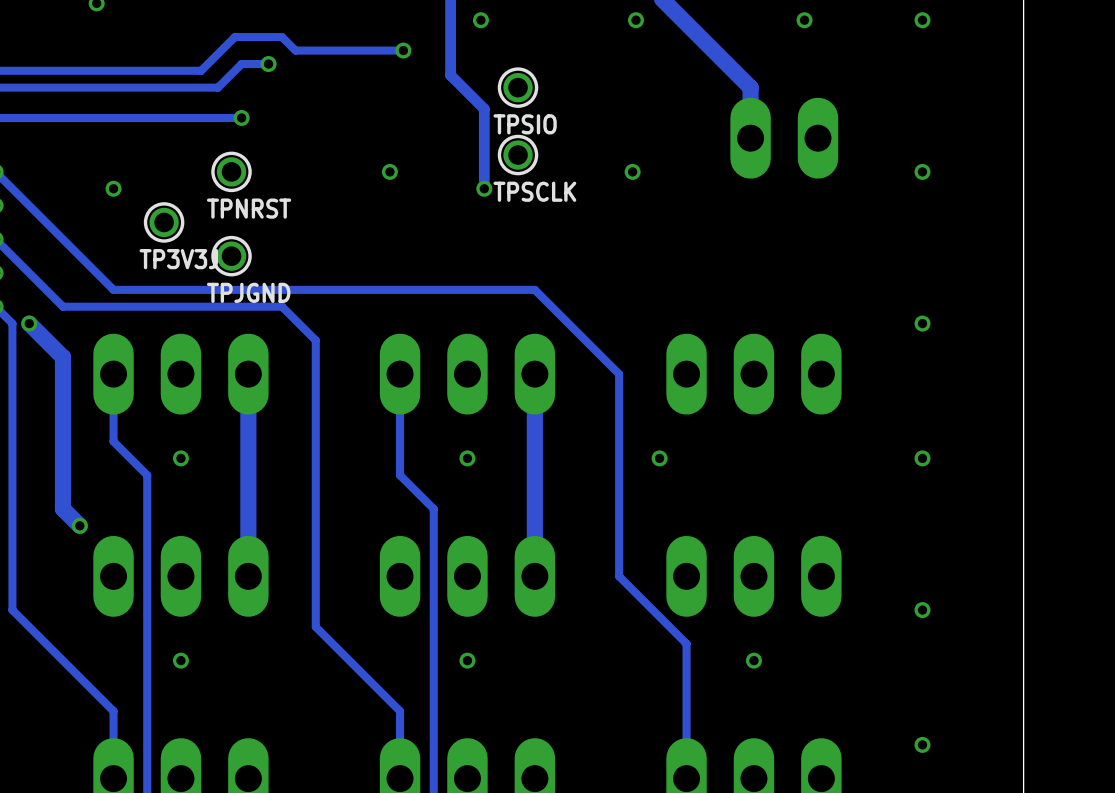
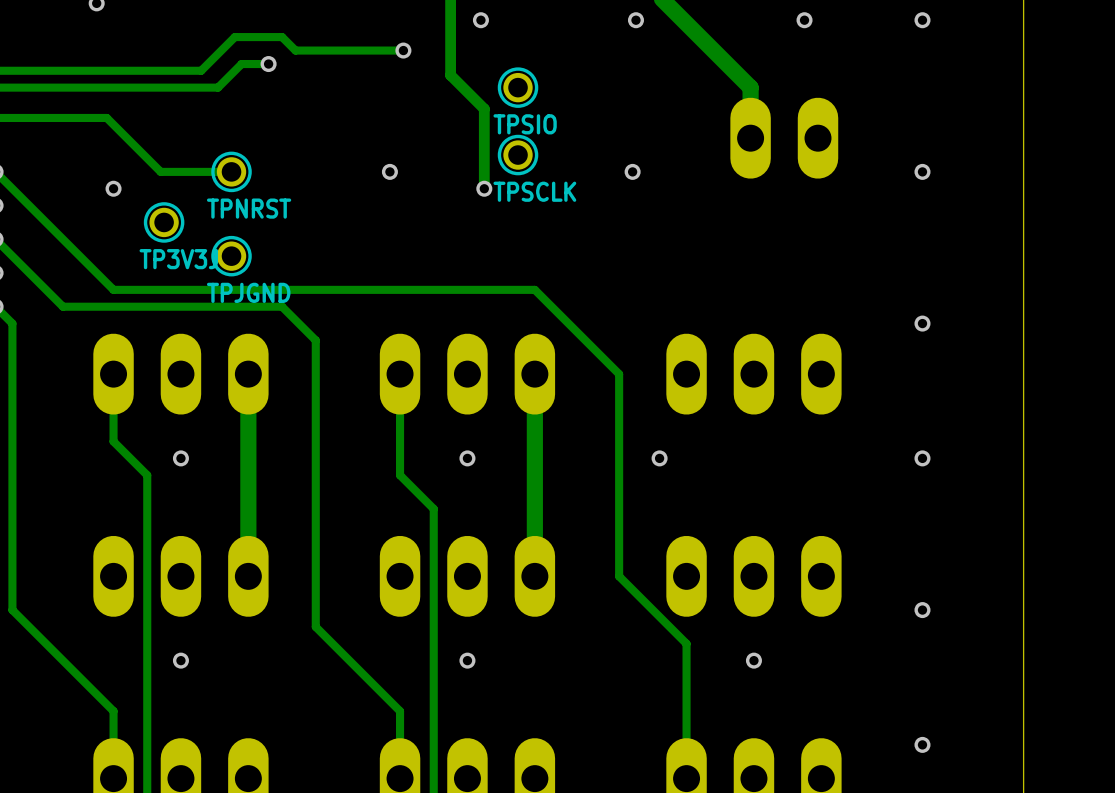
track: (241, 117) (106, 117) -> (231, 171) (160, 171) (106, 117)
via: (241, 117) -> none
track: (29, 323) (62, 357) (62, 508) (79, 525) -> none
via: (29, 323) -> none
via: (79, 525) -> none

